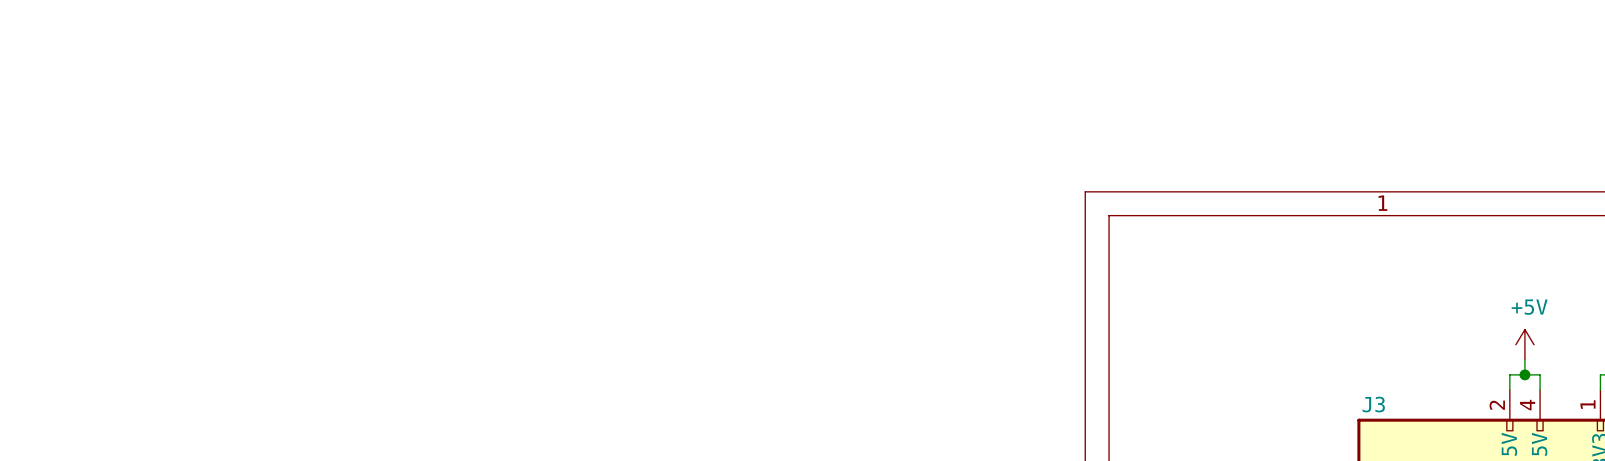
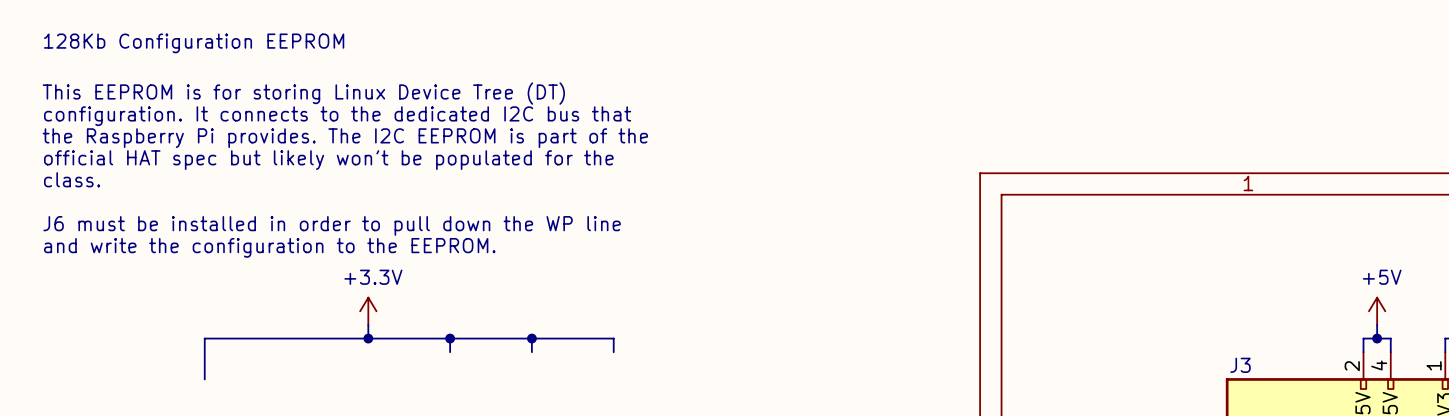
text: none -> 128Kb Configuration EEPROM (194, 43)
text: none -> This EEPROM is for storing Linux Device Tree (DT) (303, 93)
text: none -> configuration. It connects to the dedicated I2C bus that (337, 116)
text: none -> the Raspberry Pi provides. The I2C EEPROM is part of the (345, 138)
text: none -> official HAT spec but likely won't be populated for the (328, 160)
text: none -> class. (72, 179)
text: none -> J6 must be installed in order to pull down the WP line (332, 225)
text: none -> and write the configuration to the EEPROM. (269, 247)
power symbol: none -> +3.3V (368, 311)
wire: none -> (368, 324) (368, 338)
junction: none -> (368, 338)
wire: none -> (450, 338) (450, 352)
junction: none -> (450, 338)
wire: none -> (531, 338) (531, 352)
junction: none -> (531, 338)
wire: none -> (613, 352) (613, 338) (204, 338) (204, 379)

